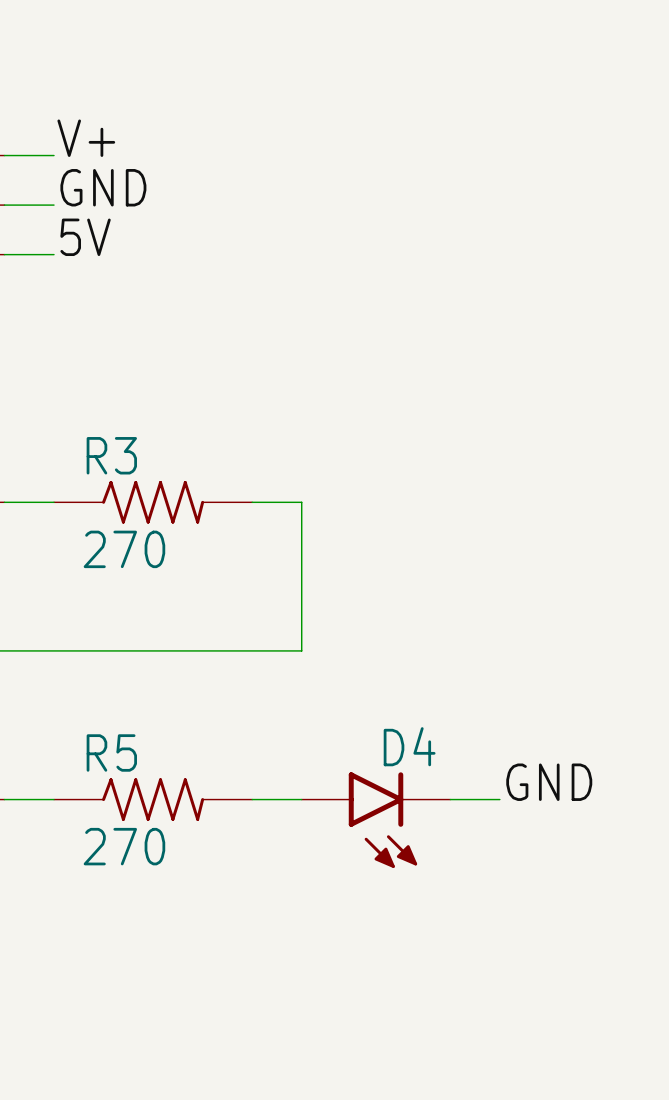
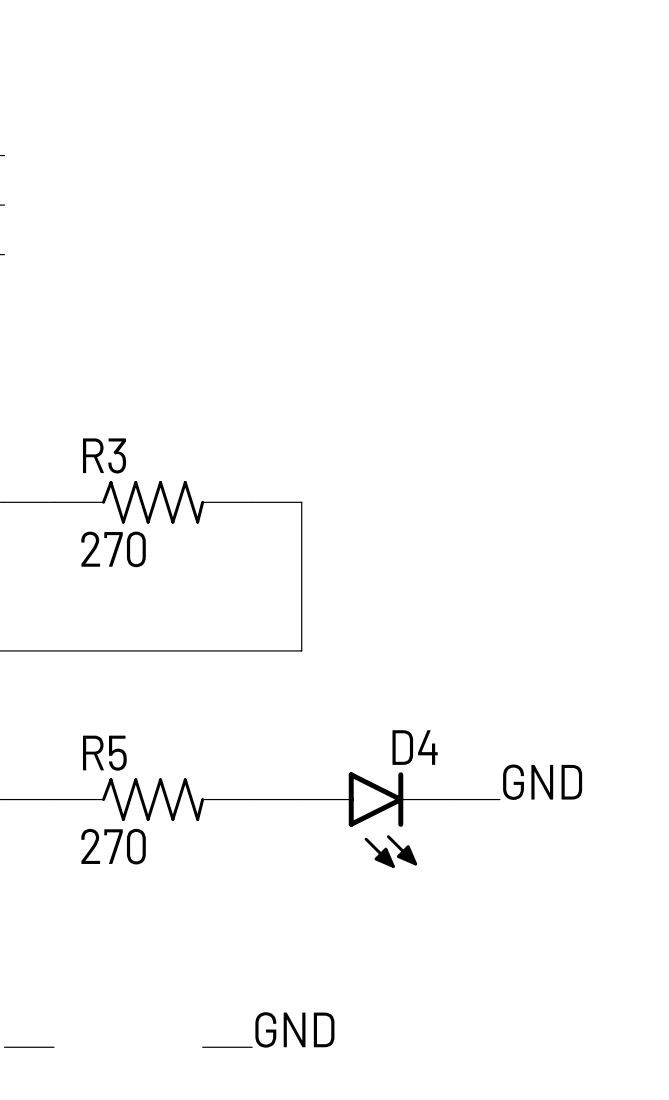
label: V+ (86, 138) -> none
wire: (4, 155) (54, 155) -> none
label: GND (103, 187) -> none
wire: (4, 205) (54, 205) -> none
label: 5V (85, 237) -> none
wire: (4, 254) (54, 254) -> none
label: none -> GND (294, 1029)
wire: none -> (4, 1047) (54, 1047)
wire: none -> (202, 1047) (252, 1047)

